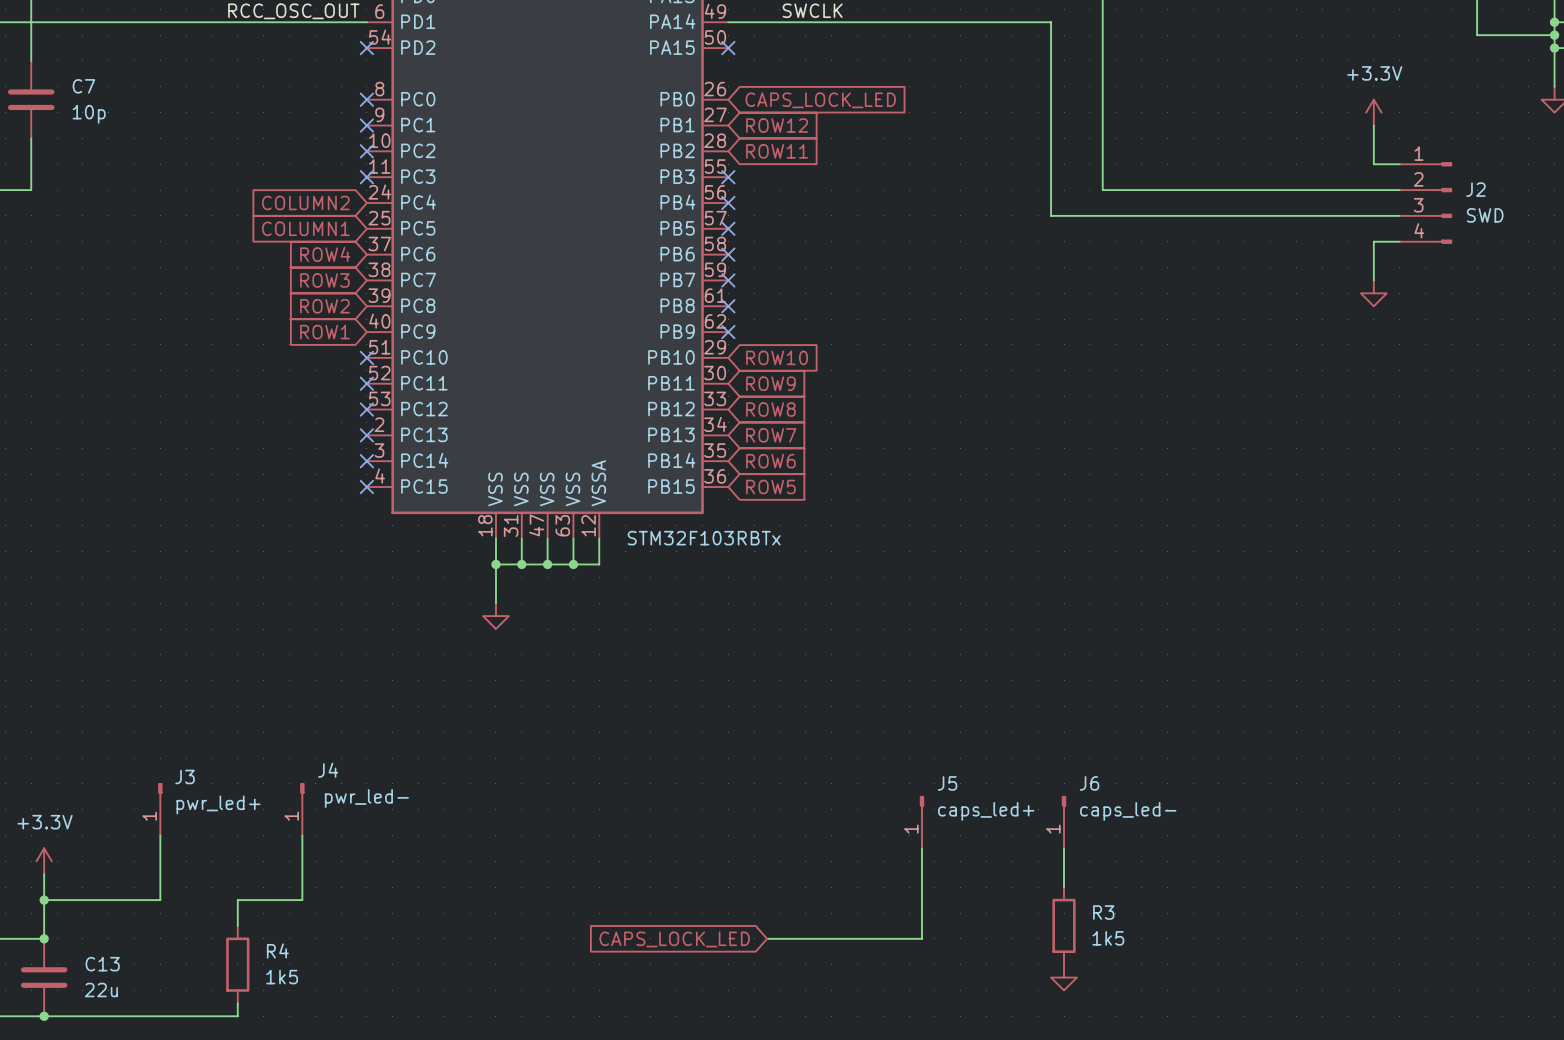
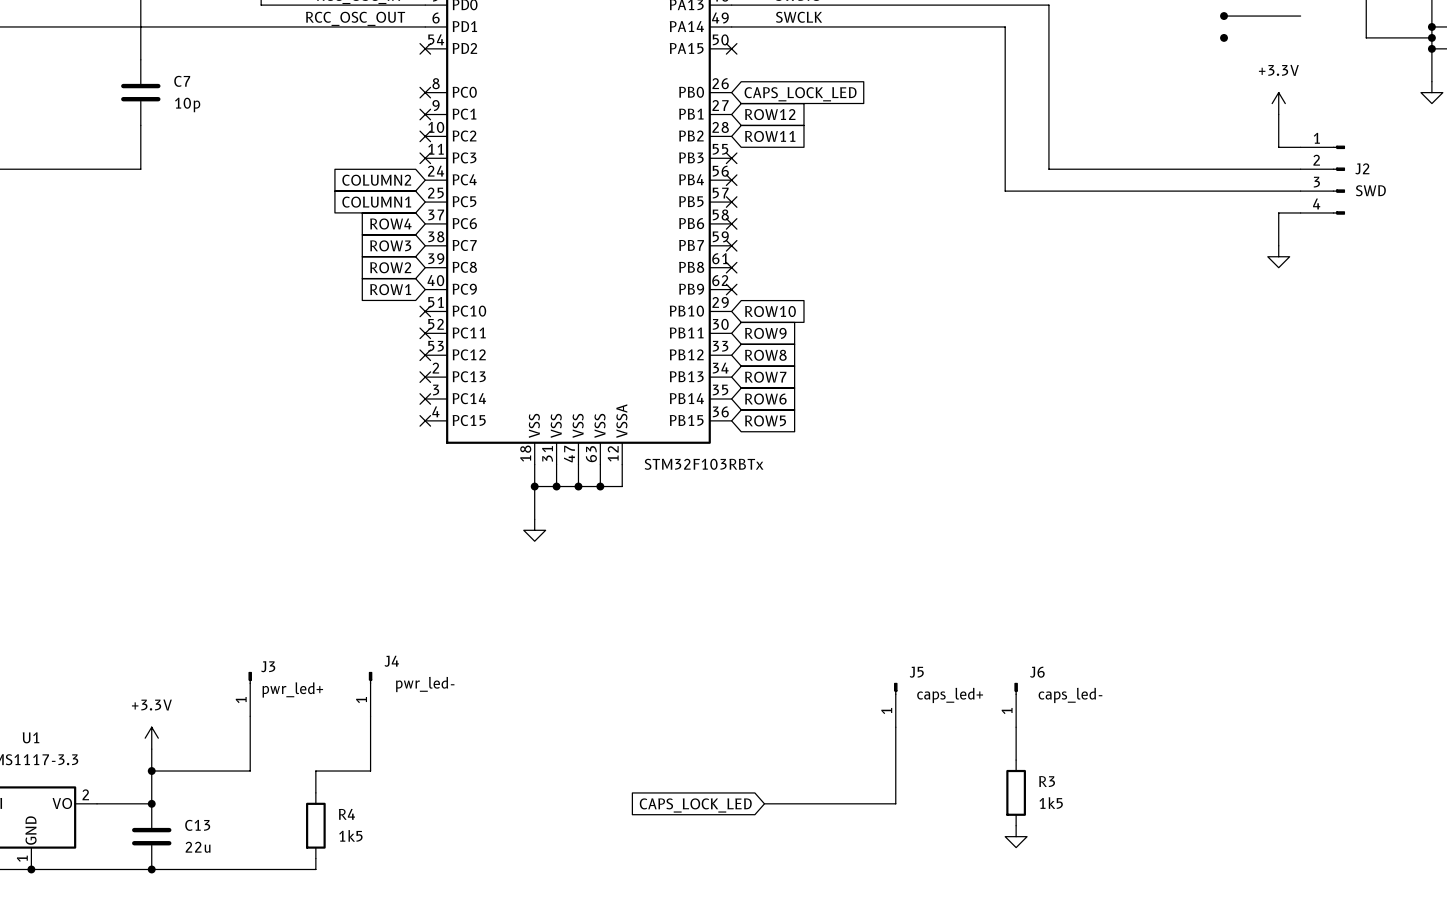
wire: none -> (1224, 16) (1300, 16)
junction: none -> (1224, 16)
junction: none -> (1224, 37)

